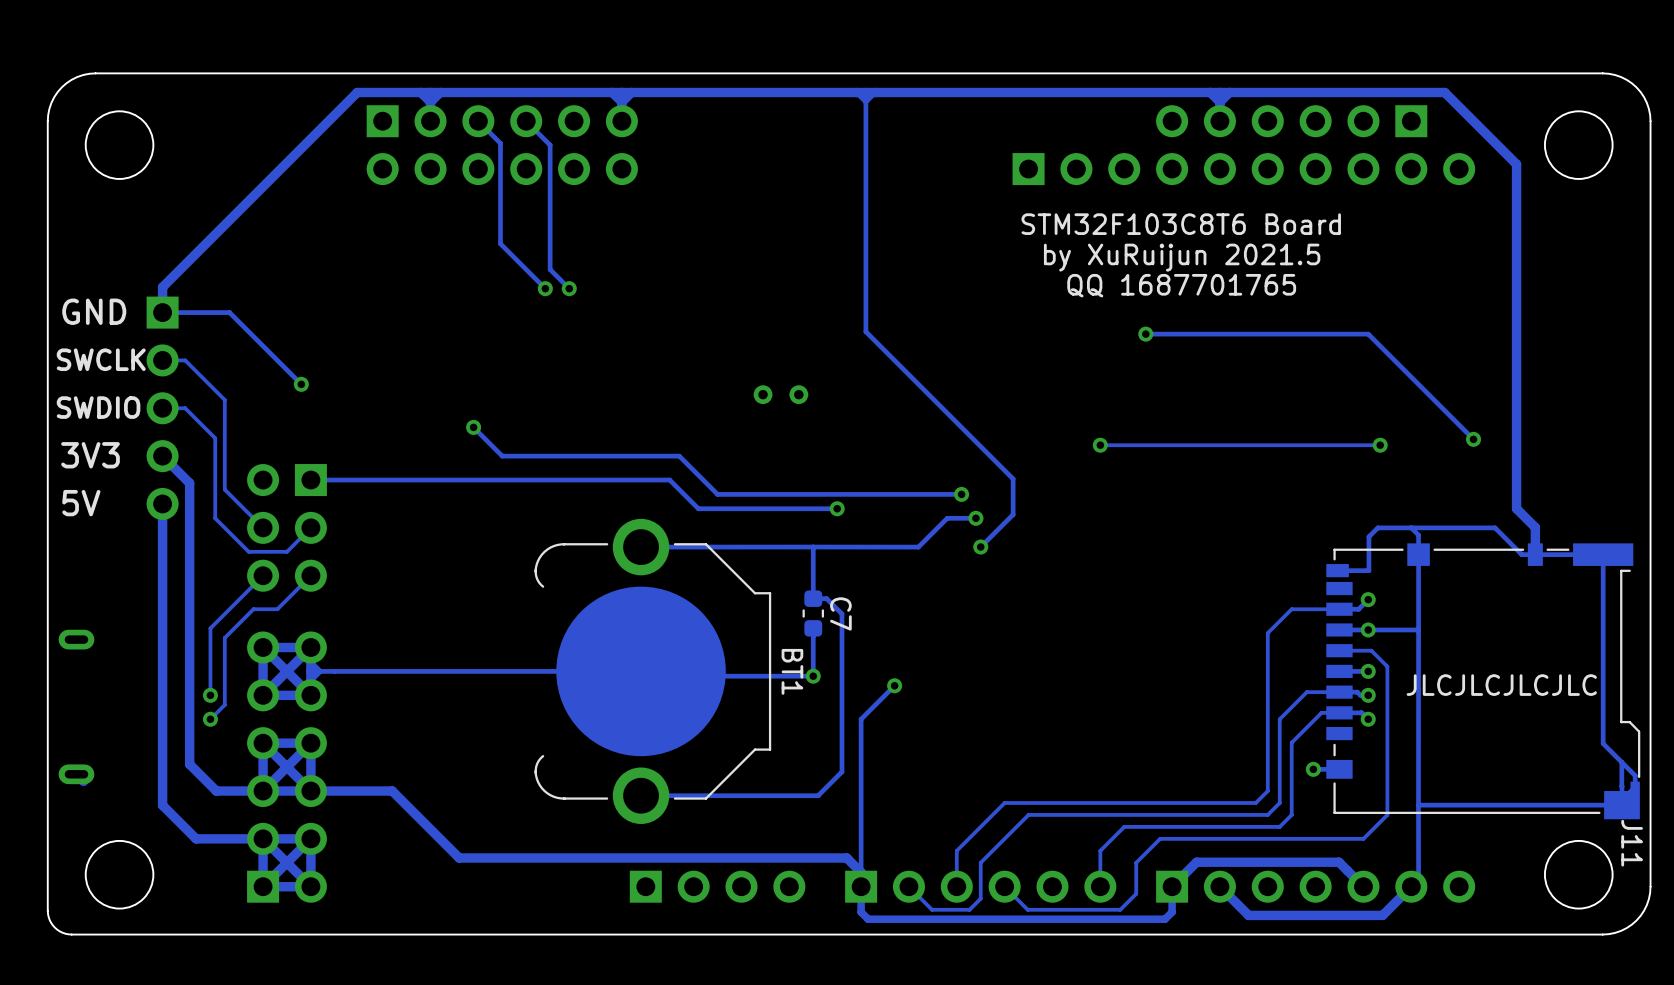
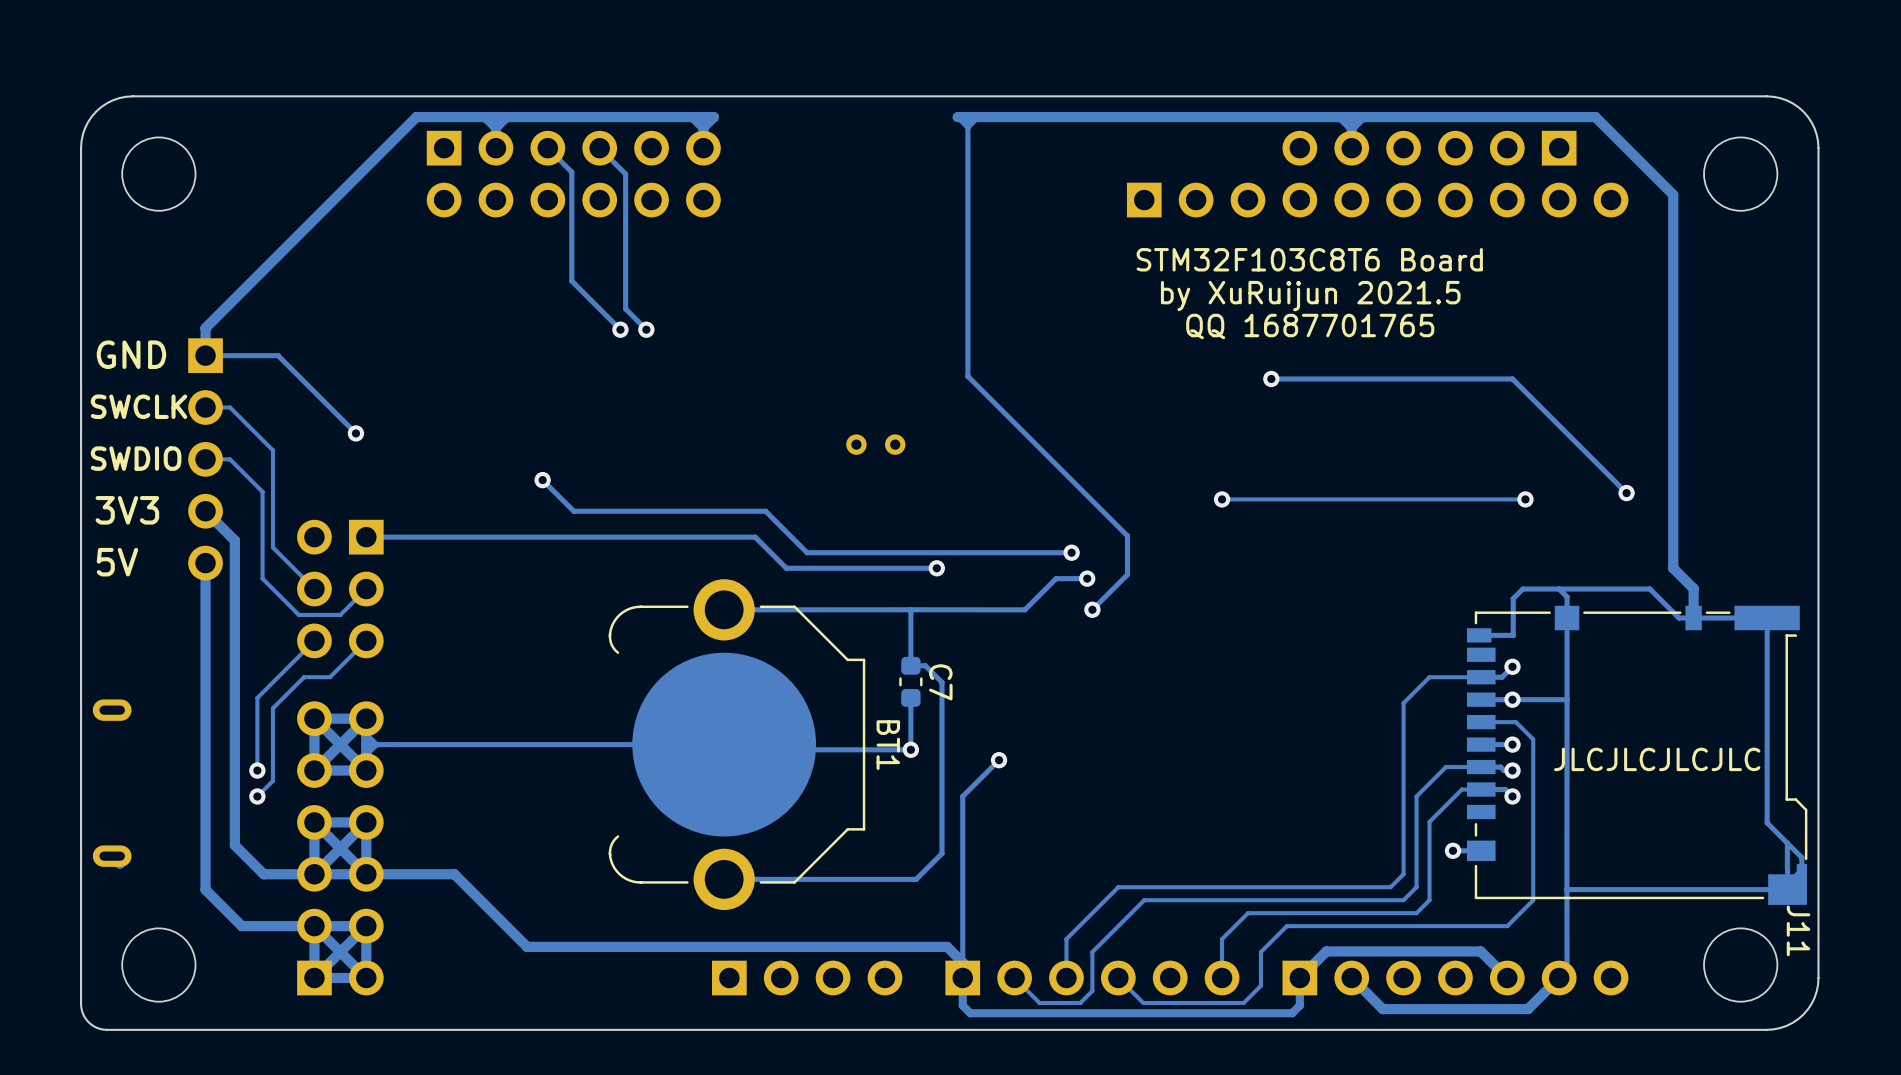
track: (856, 92) (631, 92) -> none

